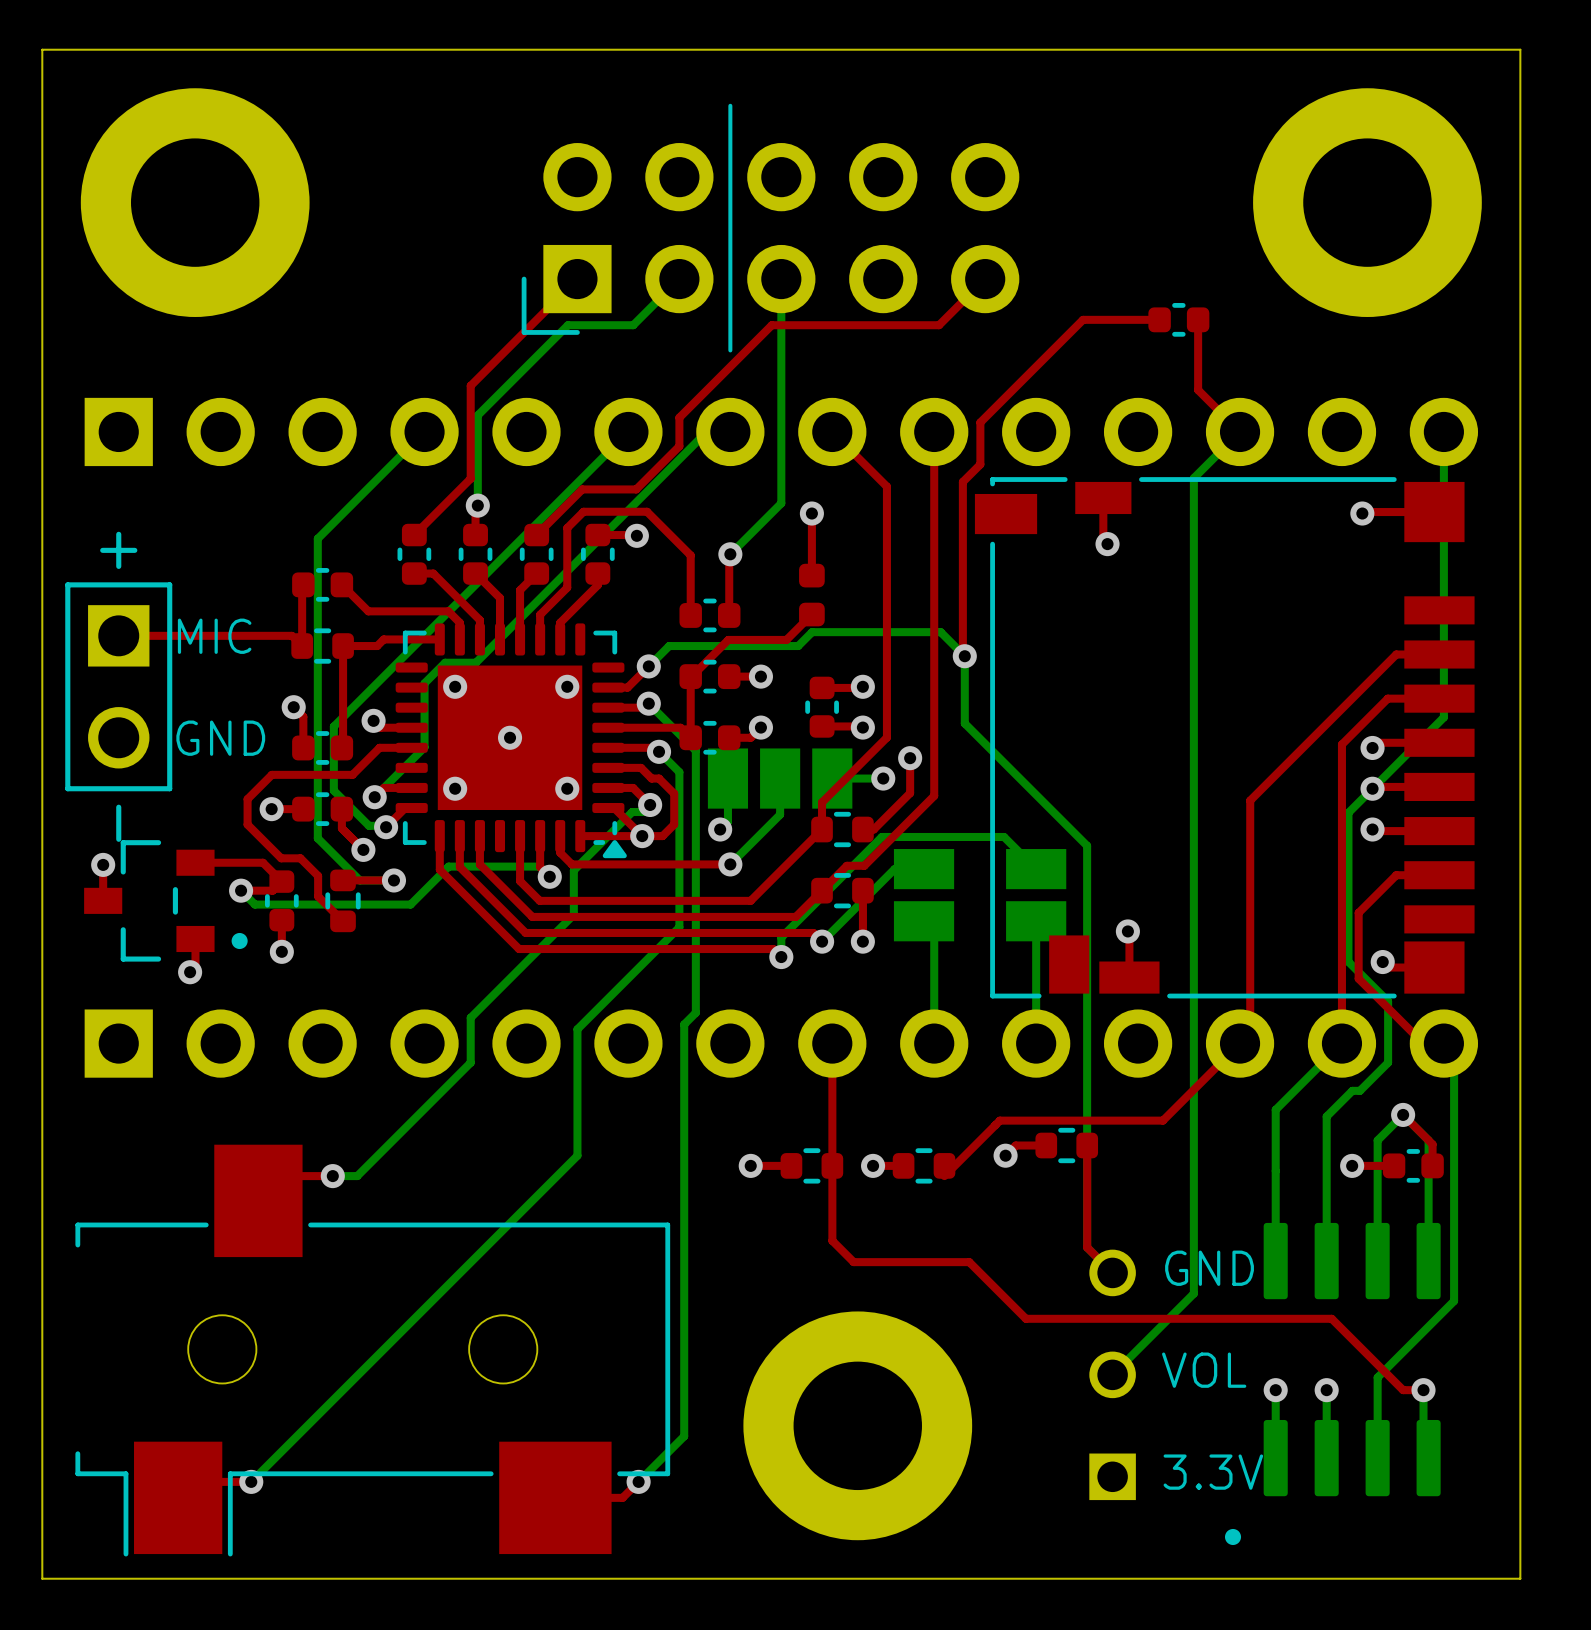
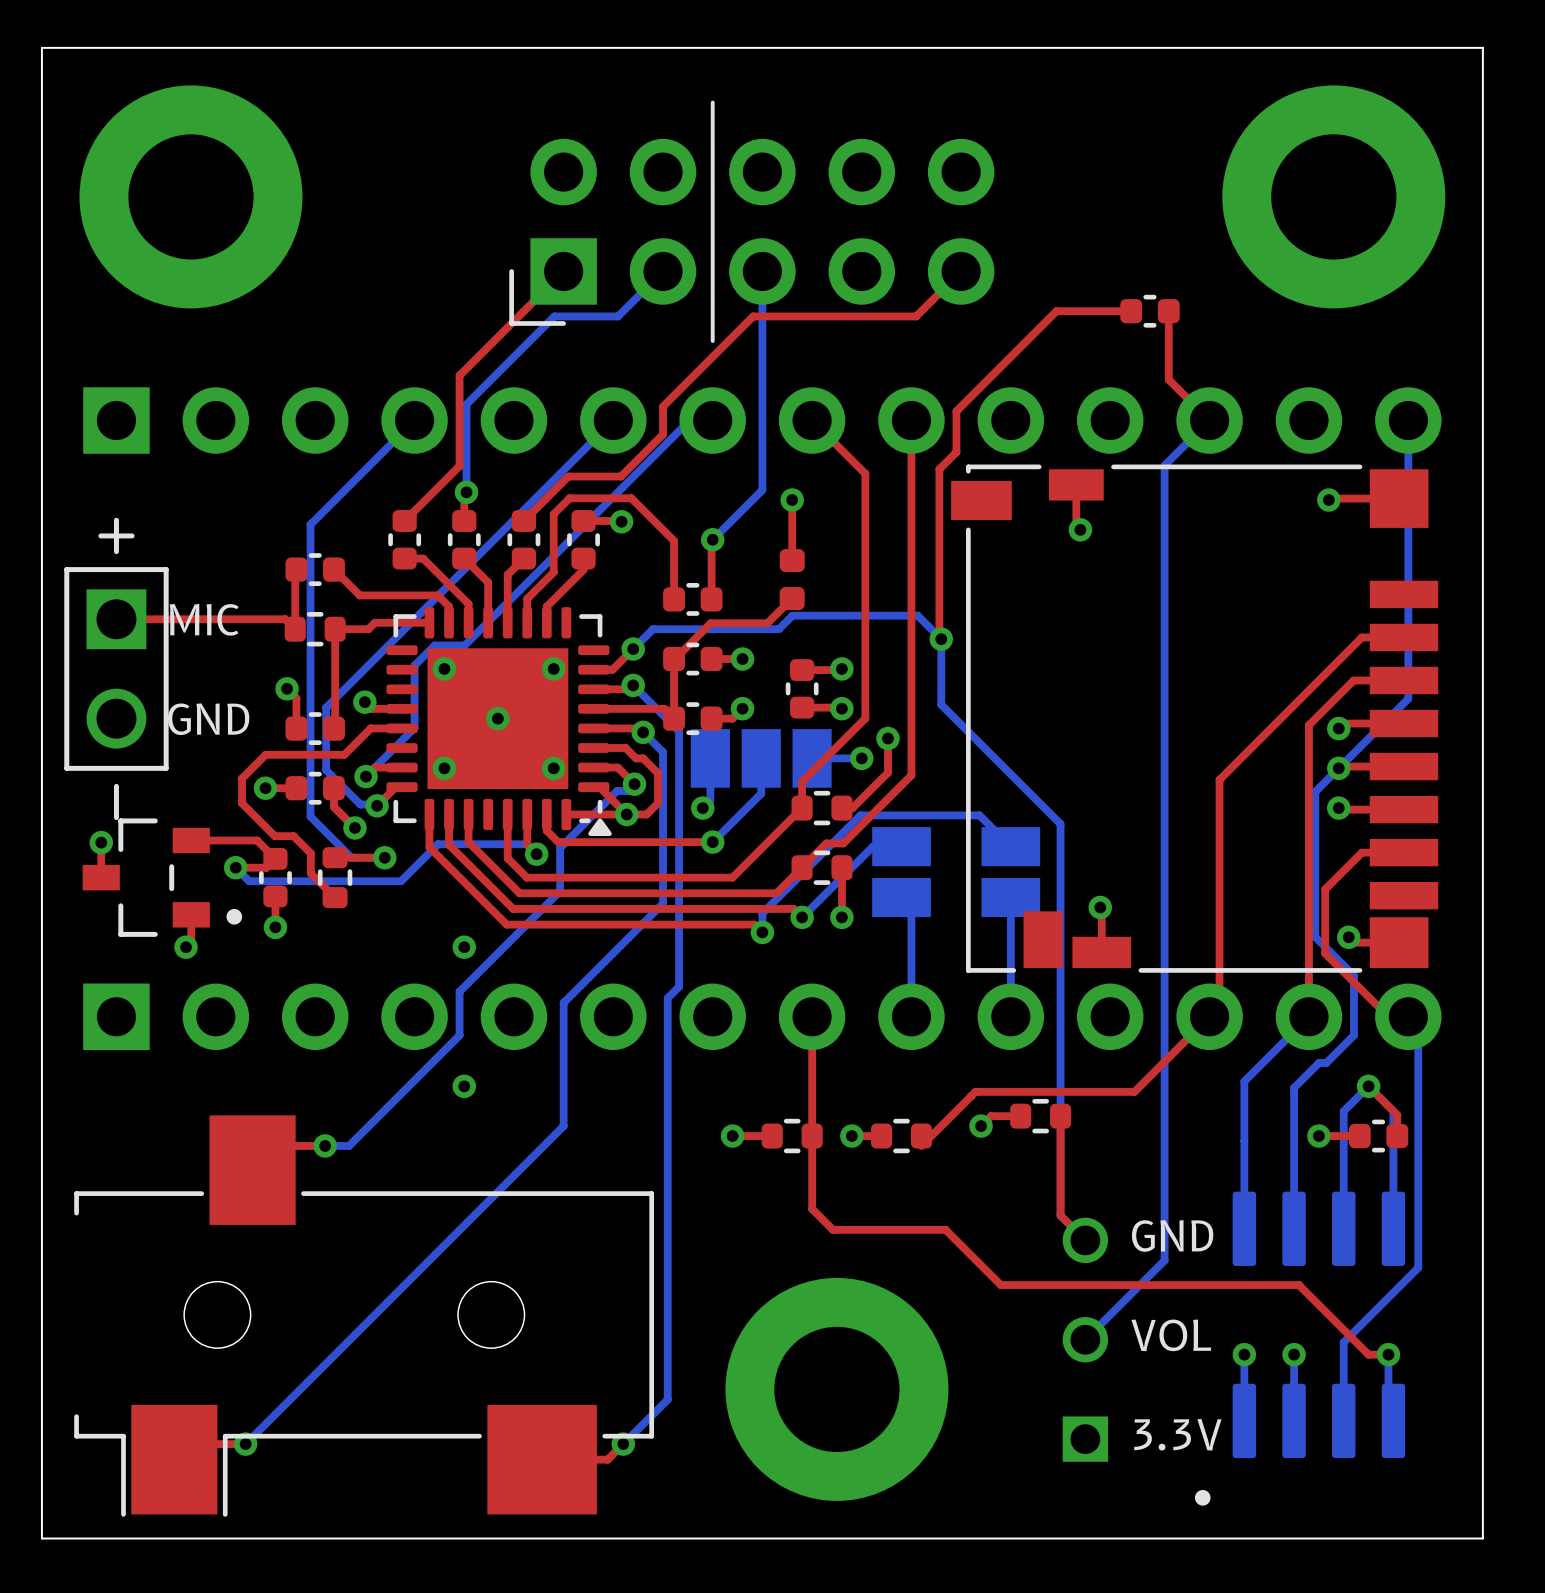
via: none -> (464, 947)
via: none -> (464, 1086)

